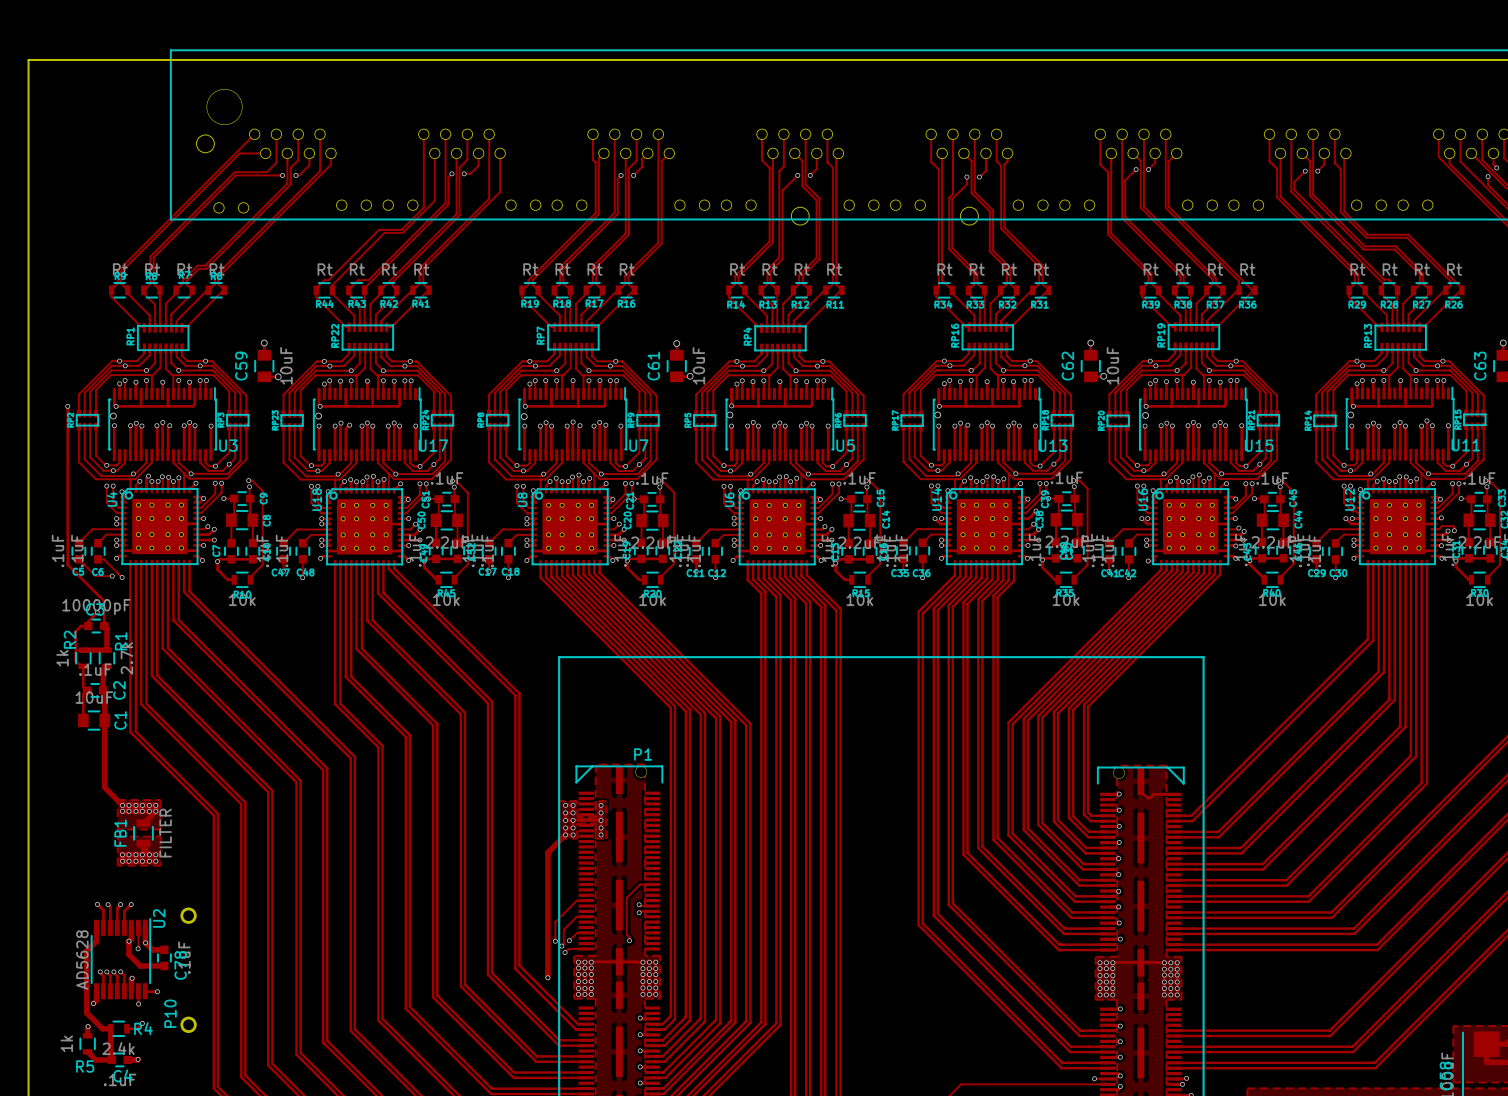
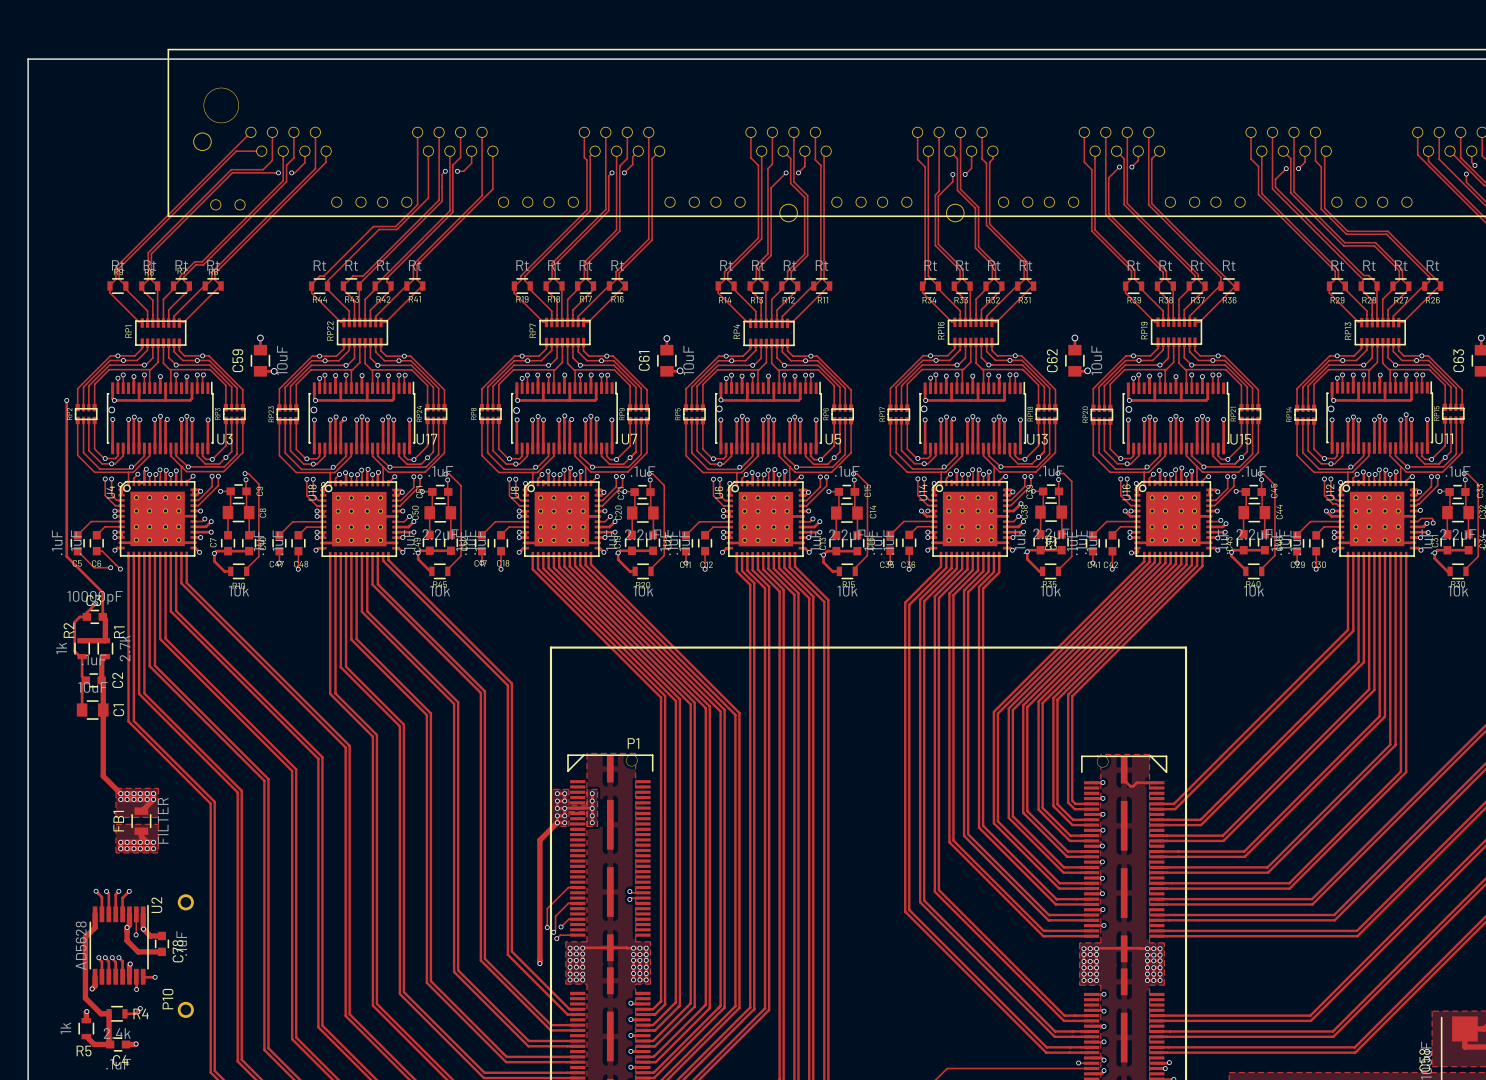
track: (652, 884) (640, 884) (626, 897) (626, 934) (629, 940) -> none
via: (629, 940) -> none

